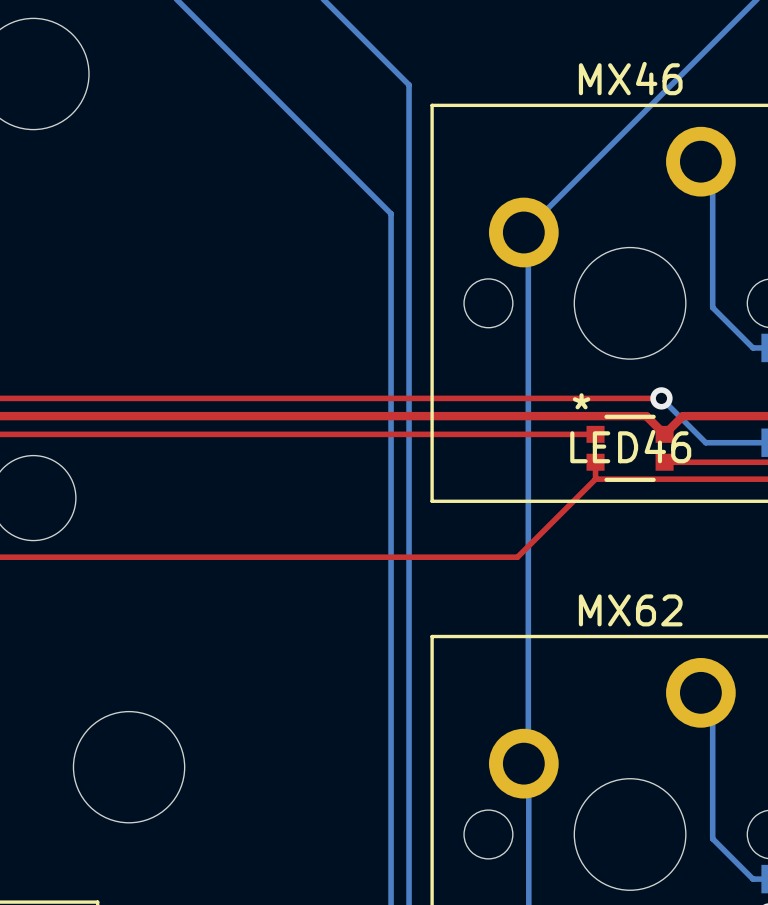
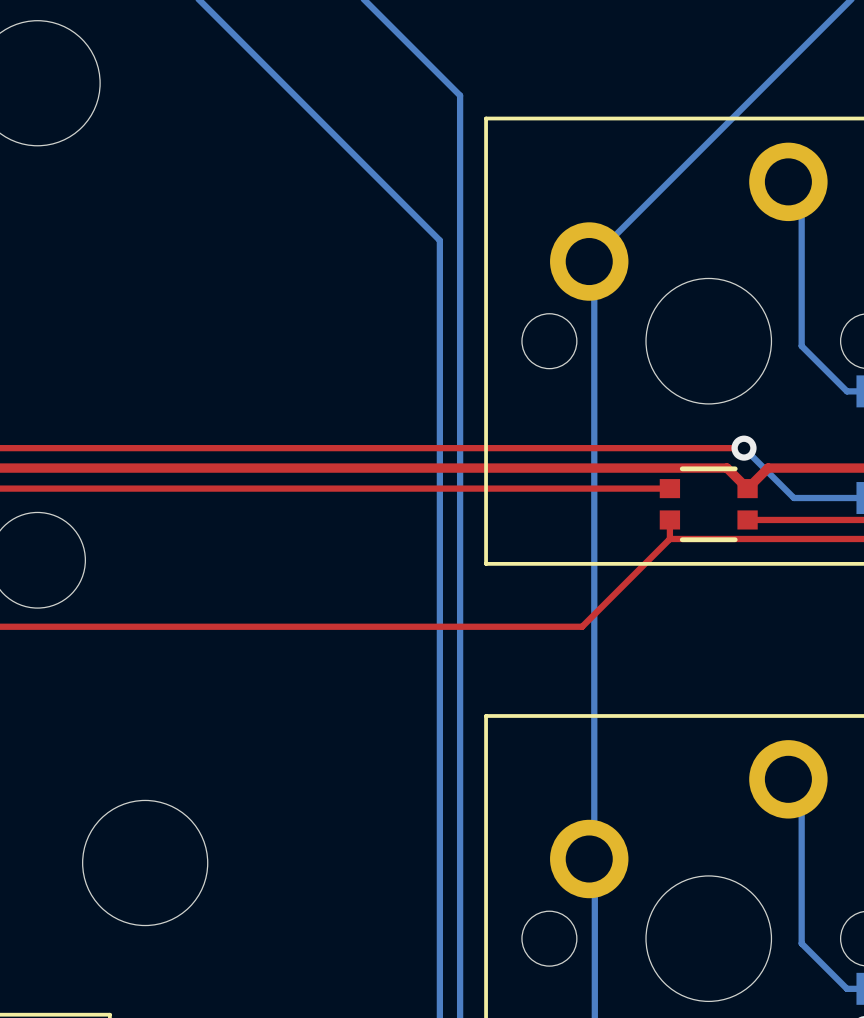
MX46 name: MX46 (630, 78) -> none
LED46 text: * (581, 401) -> none
LED46 name: LED46 (630, 446) -> none
MX62 name: MX62 (630, 610) -> none

